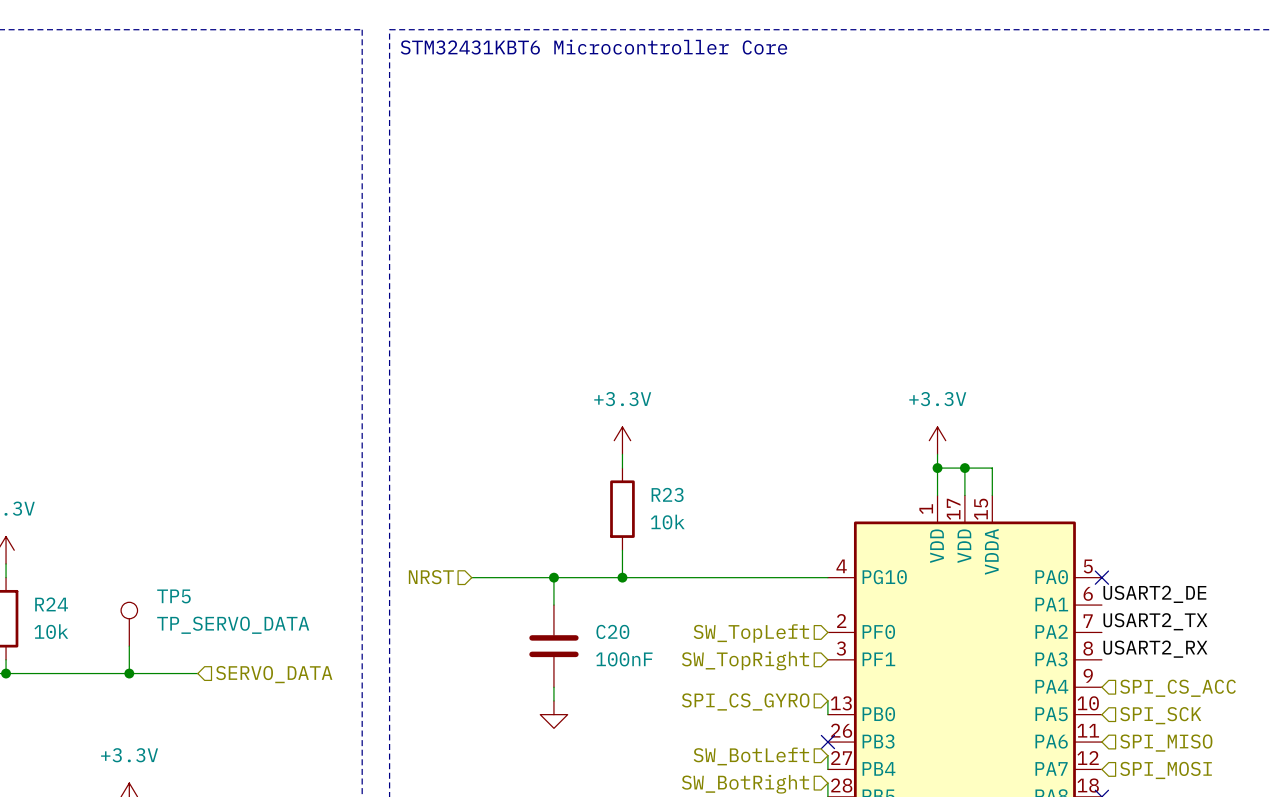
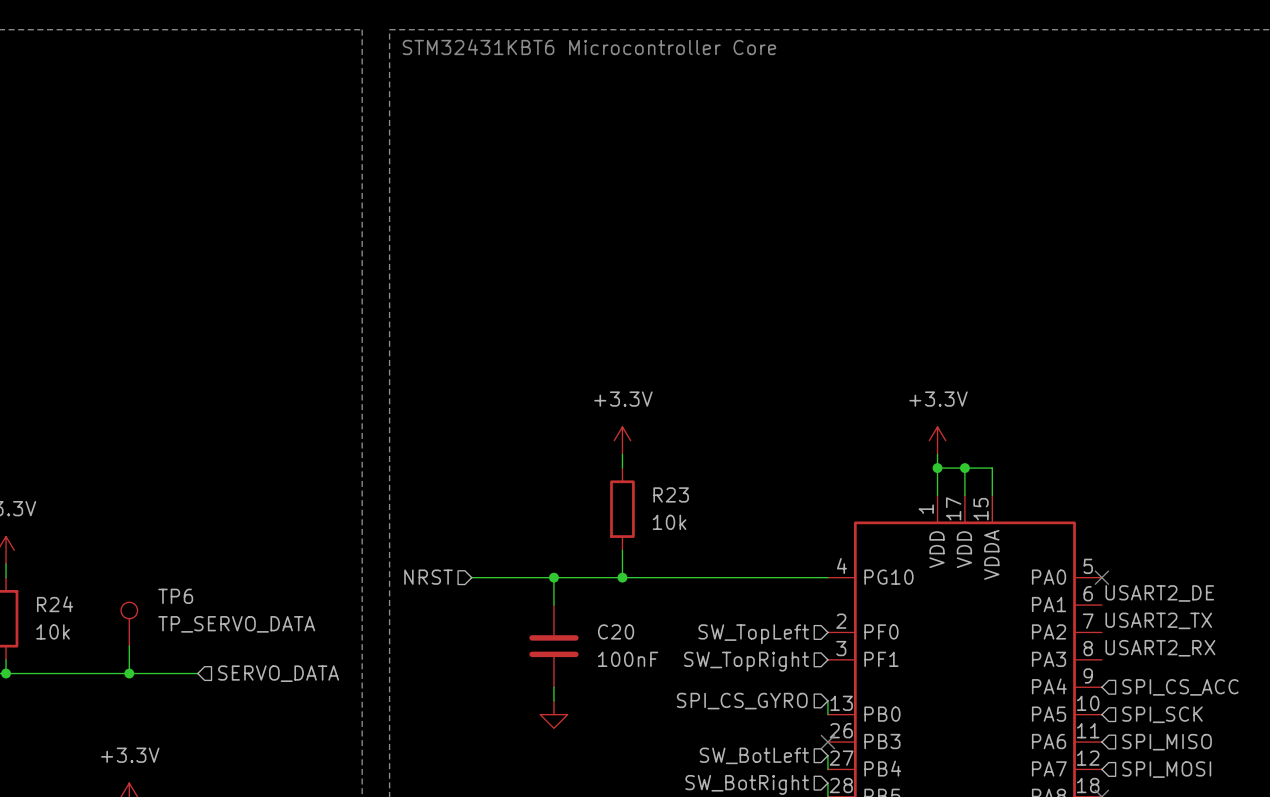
TP5 name: TP5 (173, 596) -> TP6 (175, 596)

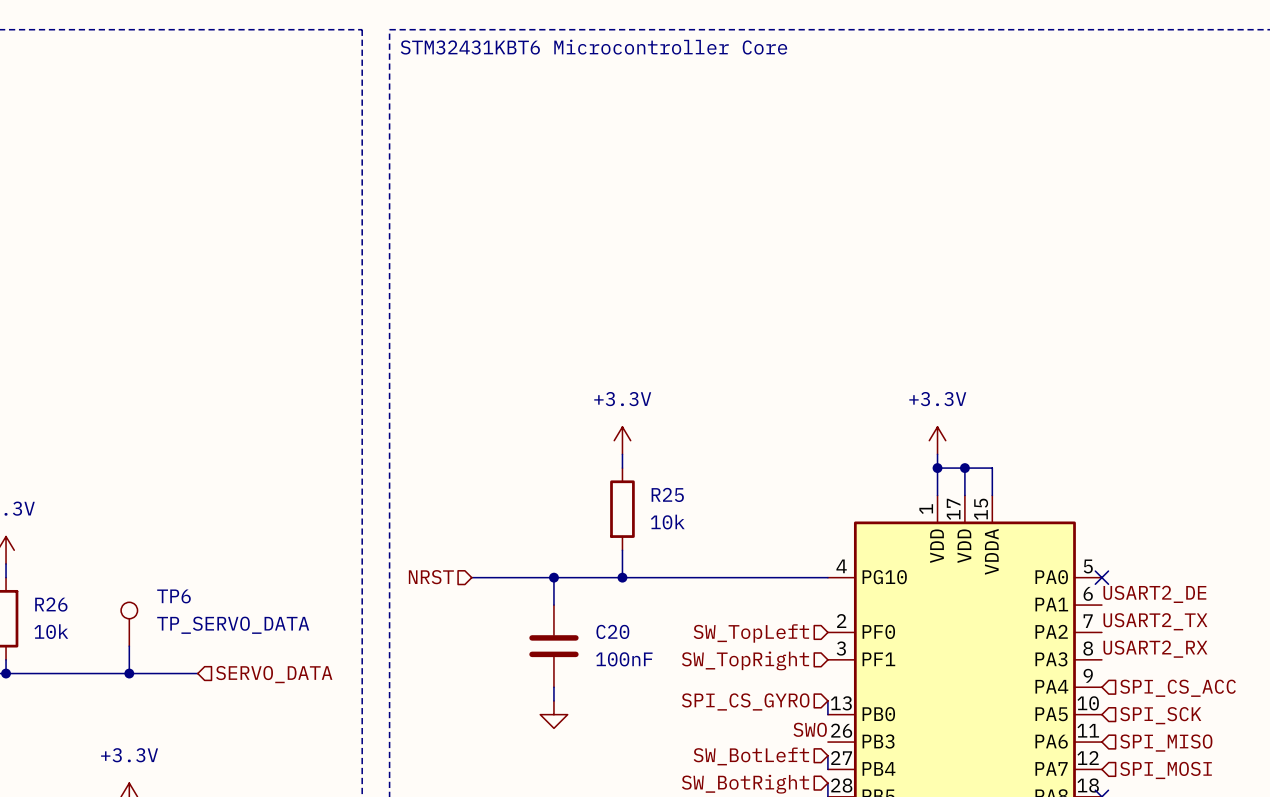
R23 name: R23 (671, 494) -> R25 (667, 494)
R24 name: R24 (55, 604) -> R26 (51, 604)
label: none -> SWO (810, 729)
no-connect mark: (827, 742) -> none

